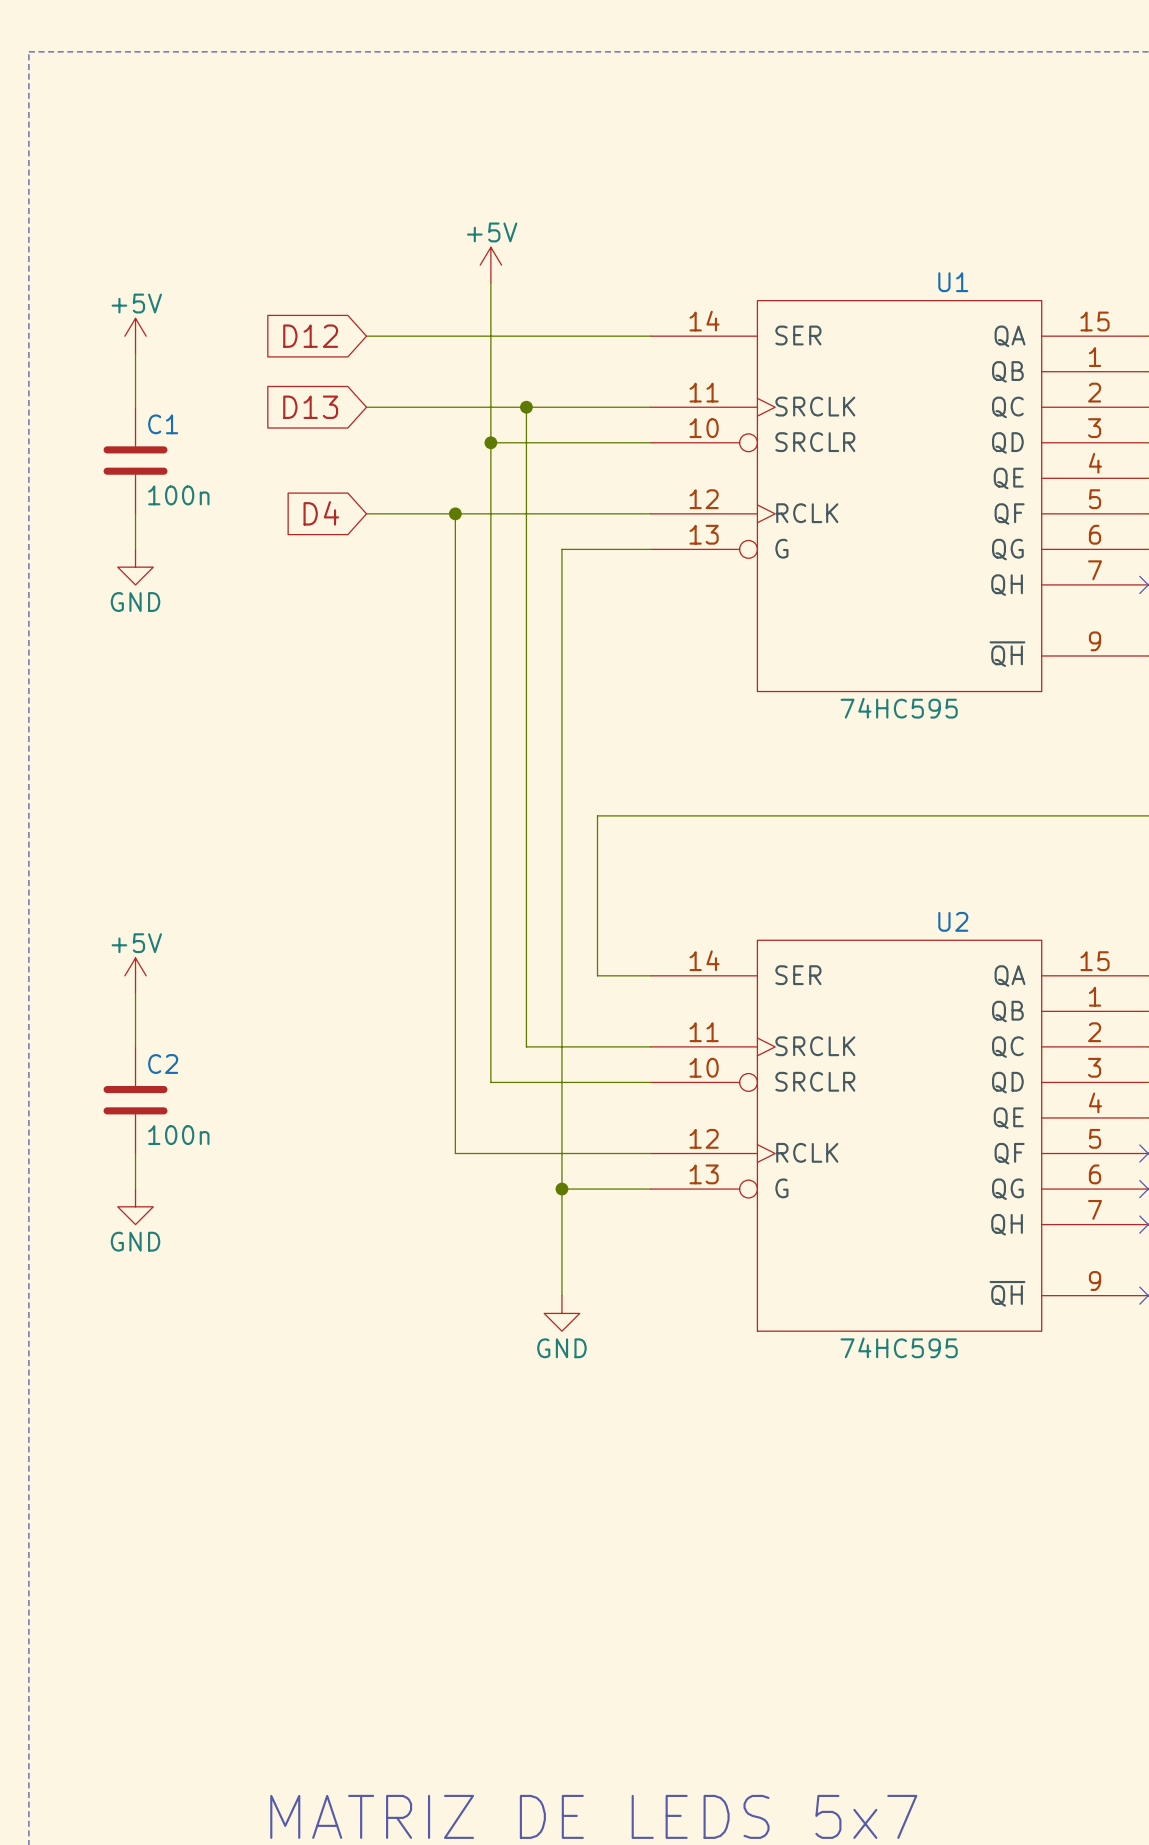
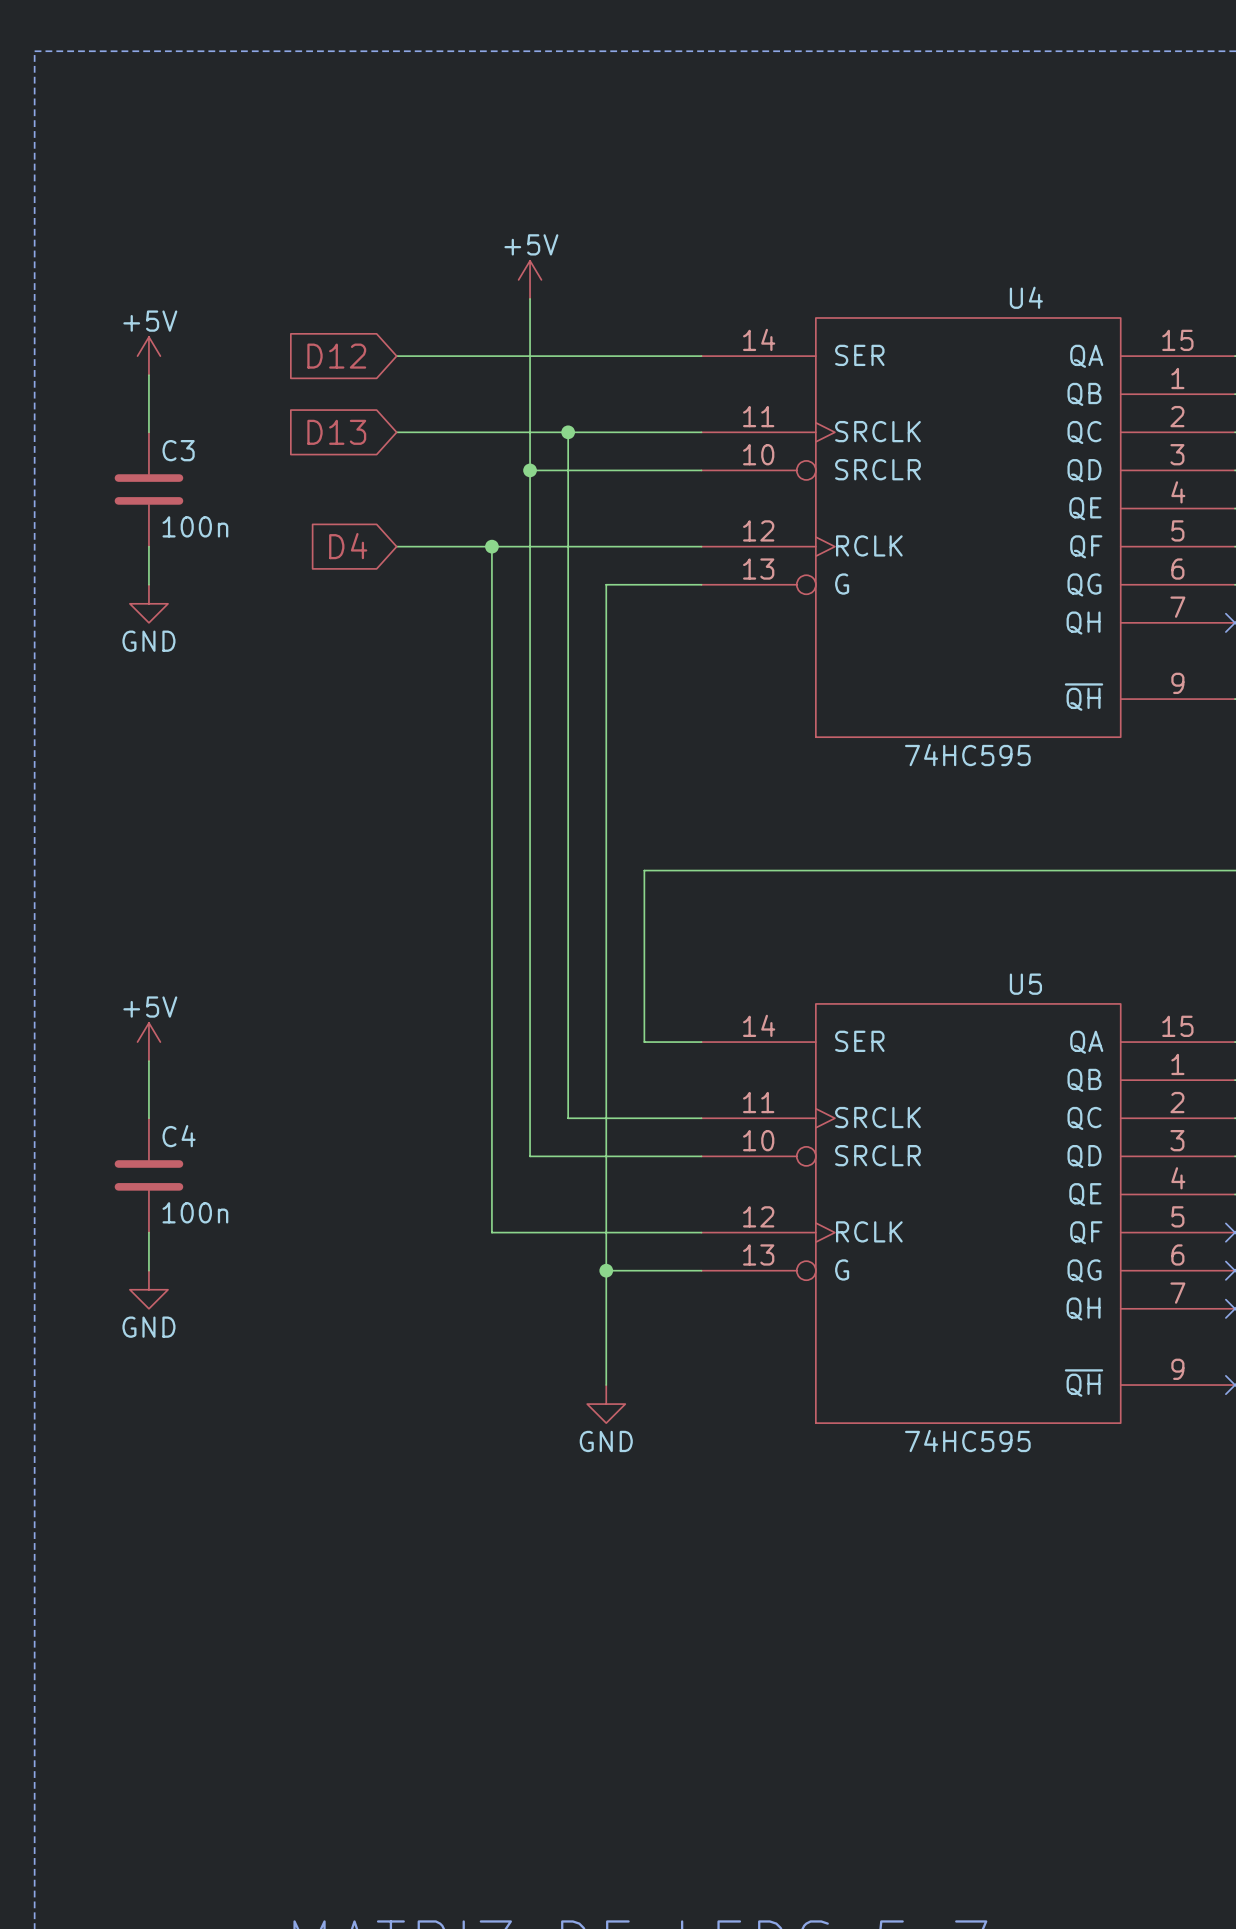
U1 name: U1 (953, 282) -> U4 (1026, 297)
C1 name: C1 (163, 424) -> C3 (178, 450)
U2 name: U2 (953, 921) -> U5 (1025, 984)
C2 name: C2 (163, 1064) -> C4 (179, 1136)

